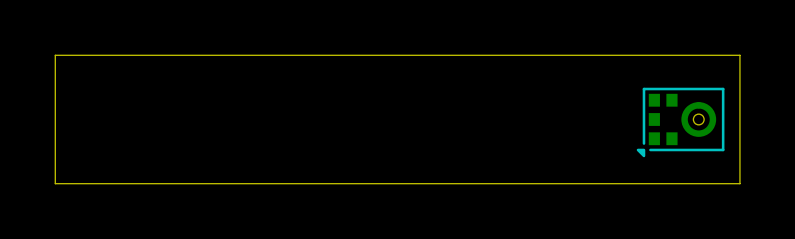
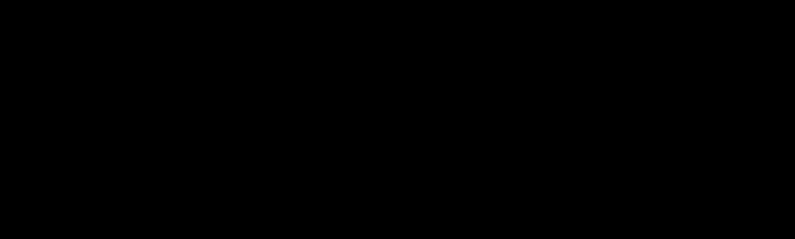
board edge: (739, 55) (55, 55) (55, 183) (739, 183) (739, 55) -> none
part: (680, 122) -> none

